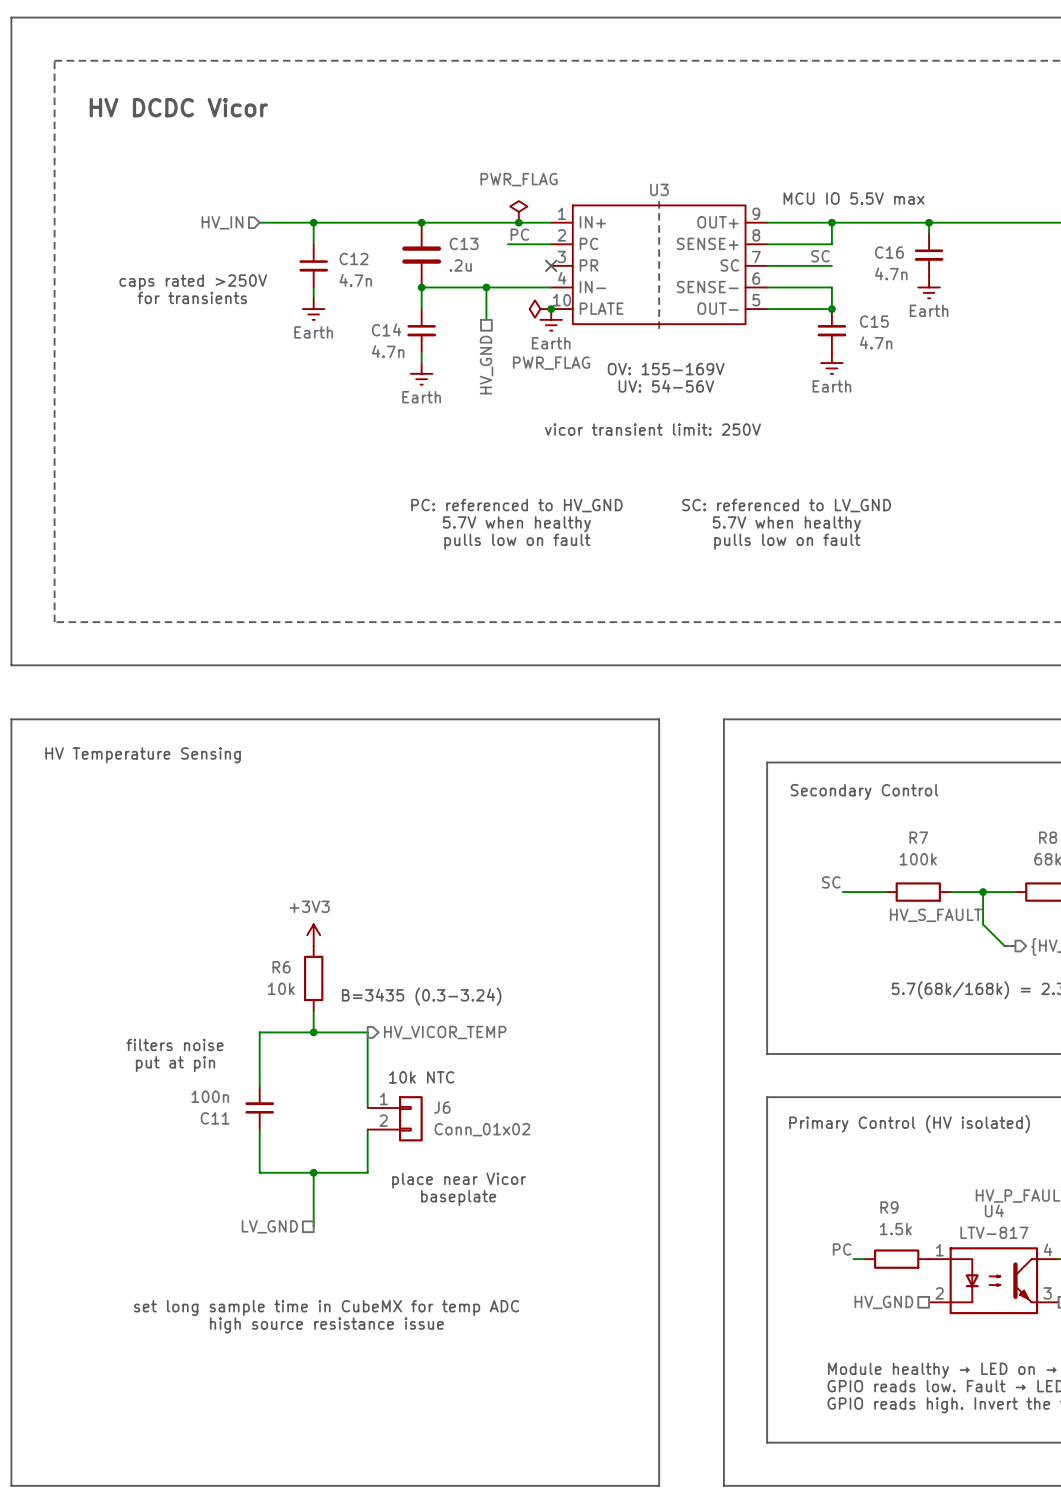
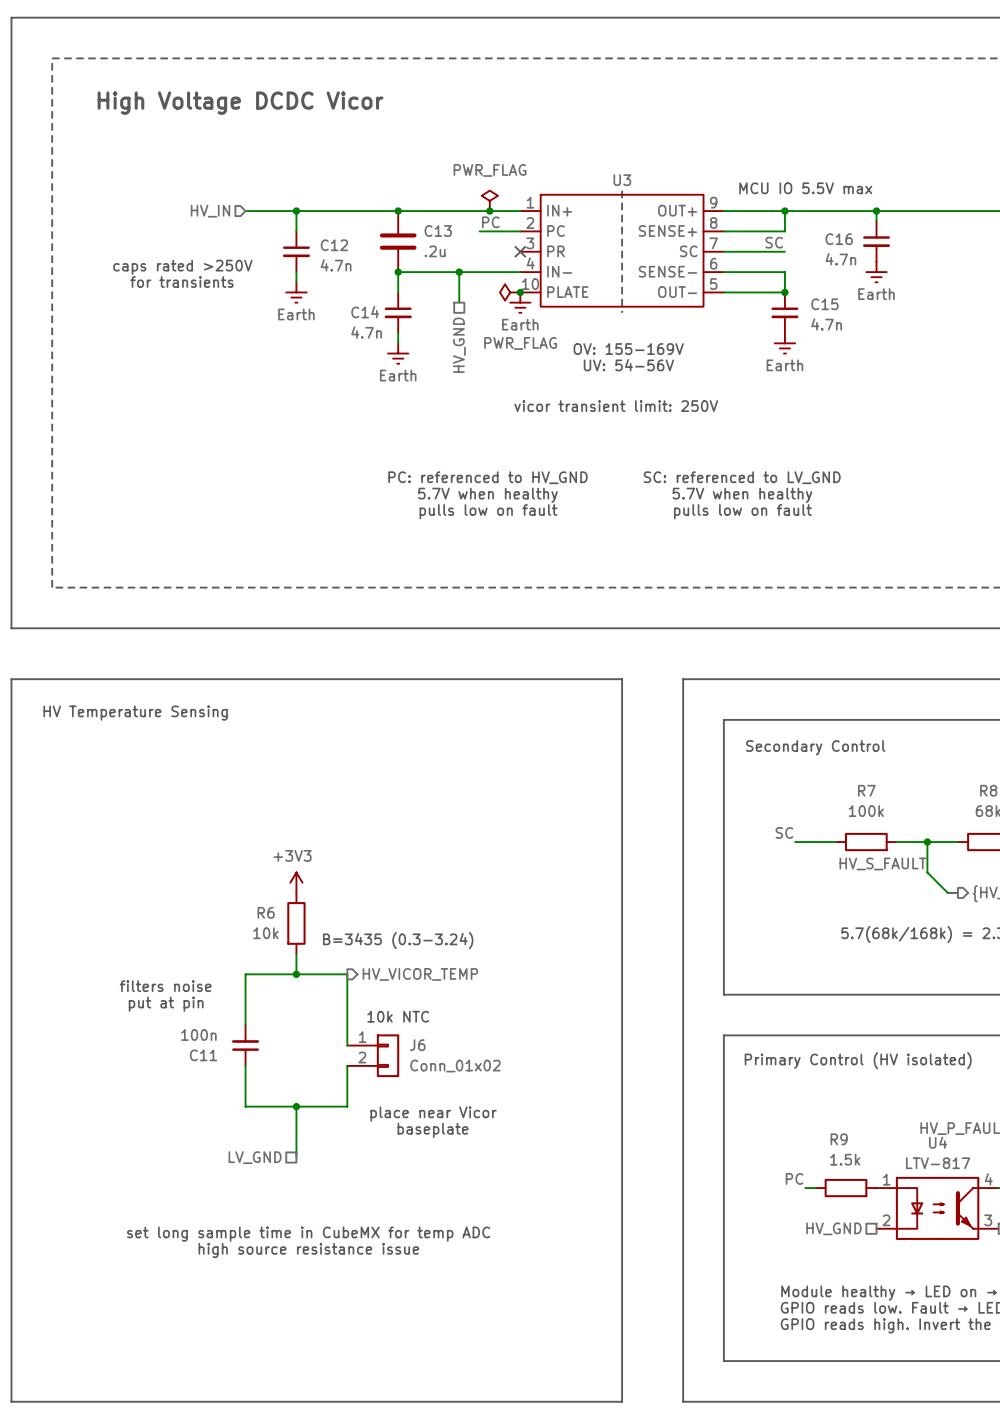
text: HV DCDC Vicor (178, 107) -> High Voltage DCDC Vicor (240, 103)

